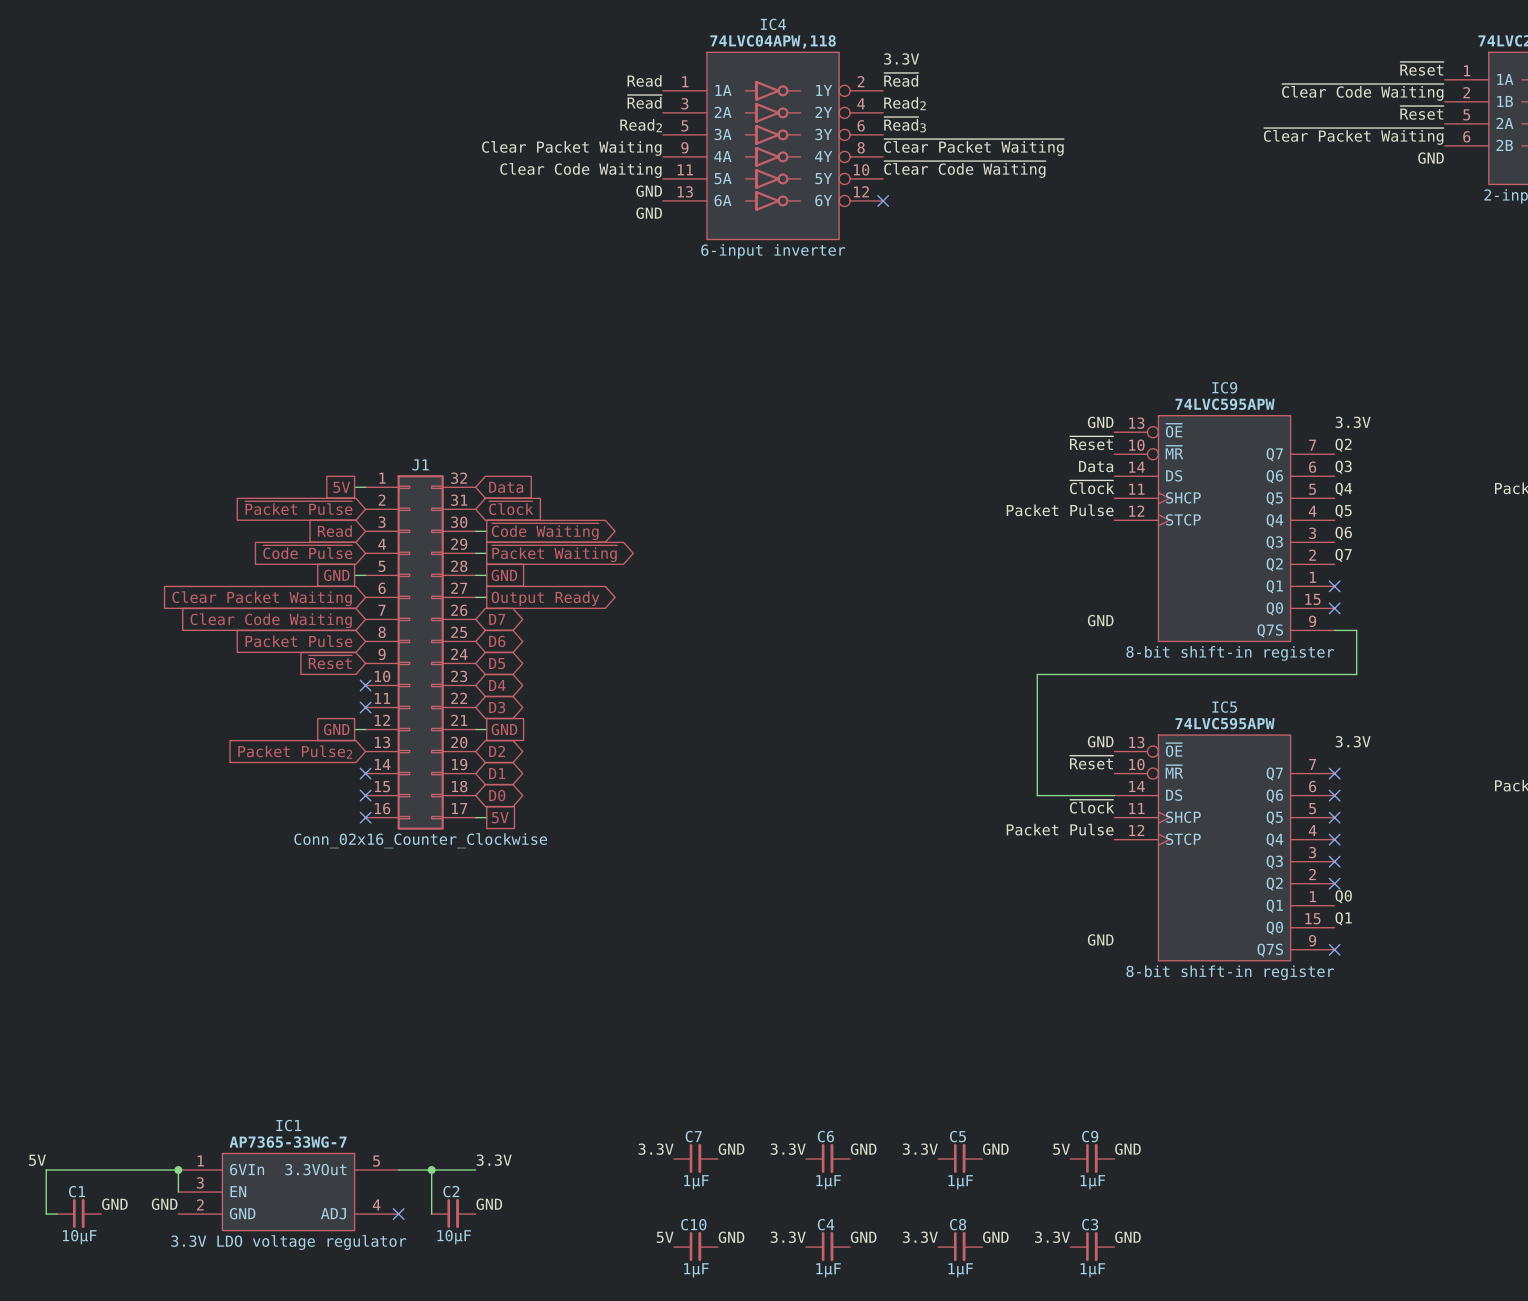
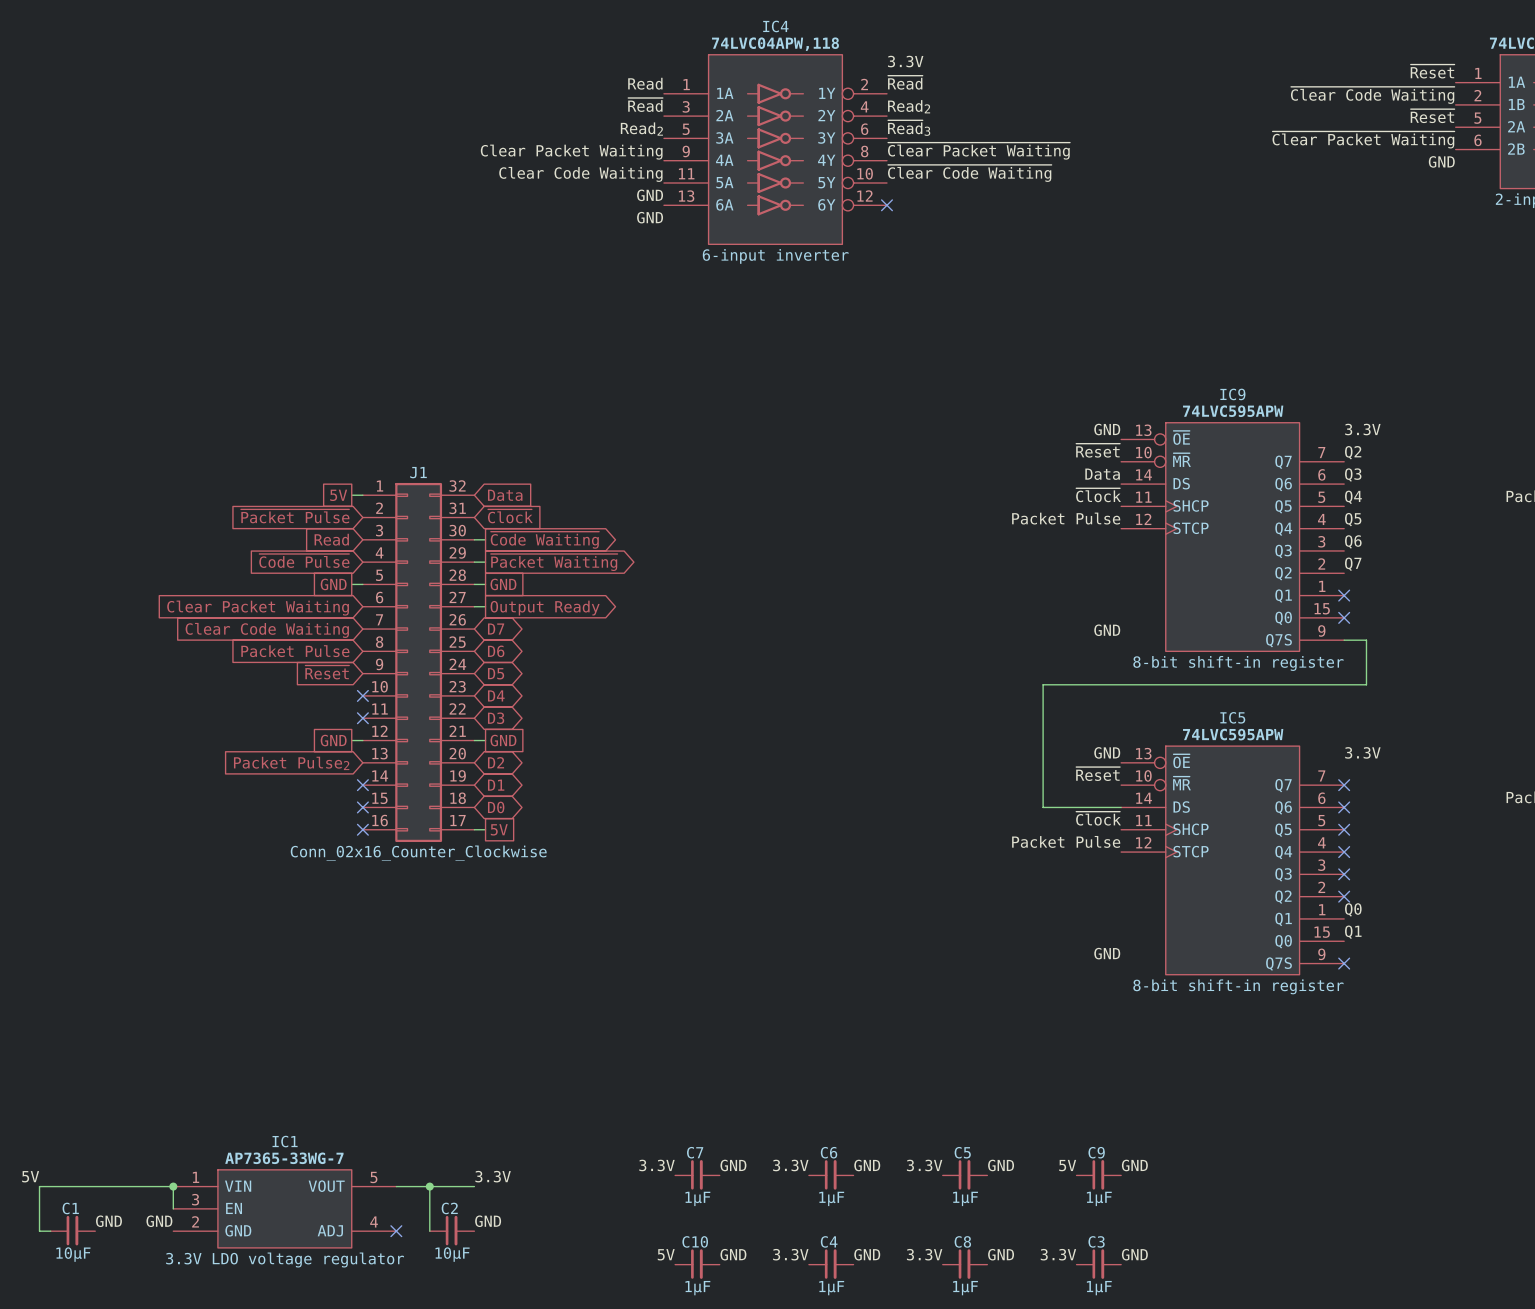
IC1 pin name: 6VIn (247, 1169) -> VIN (238, 1186)
IC1 pin name: 3.3VOut (315, 1169) -> VOUT (326, 1186)

